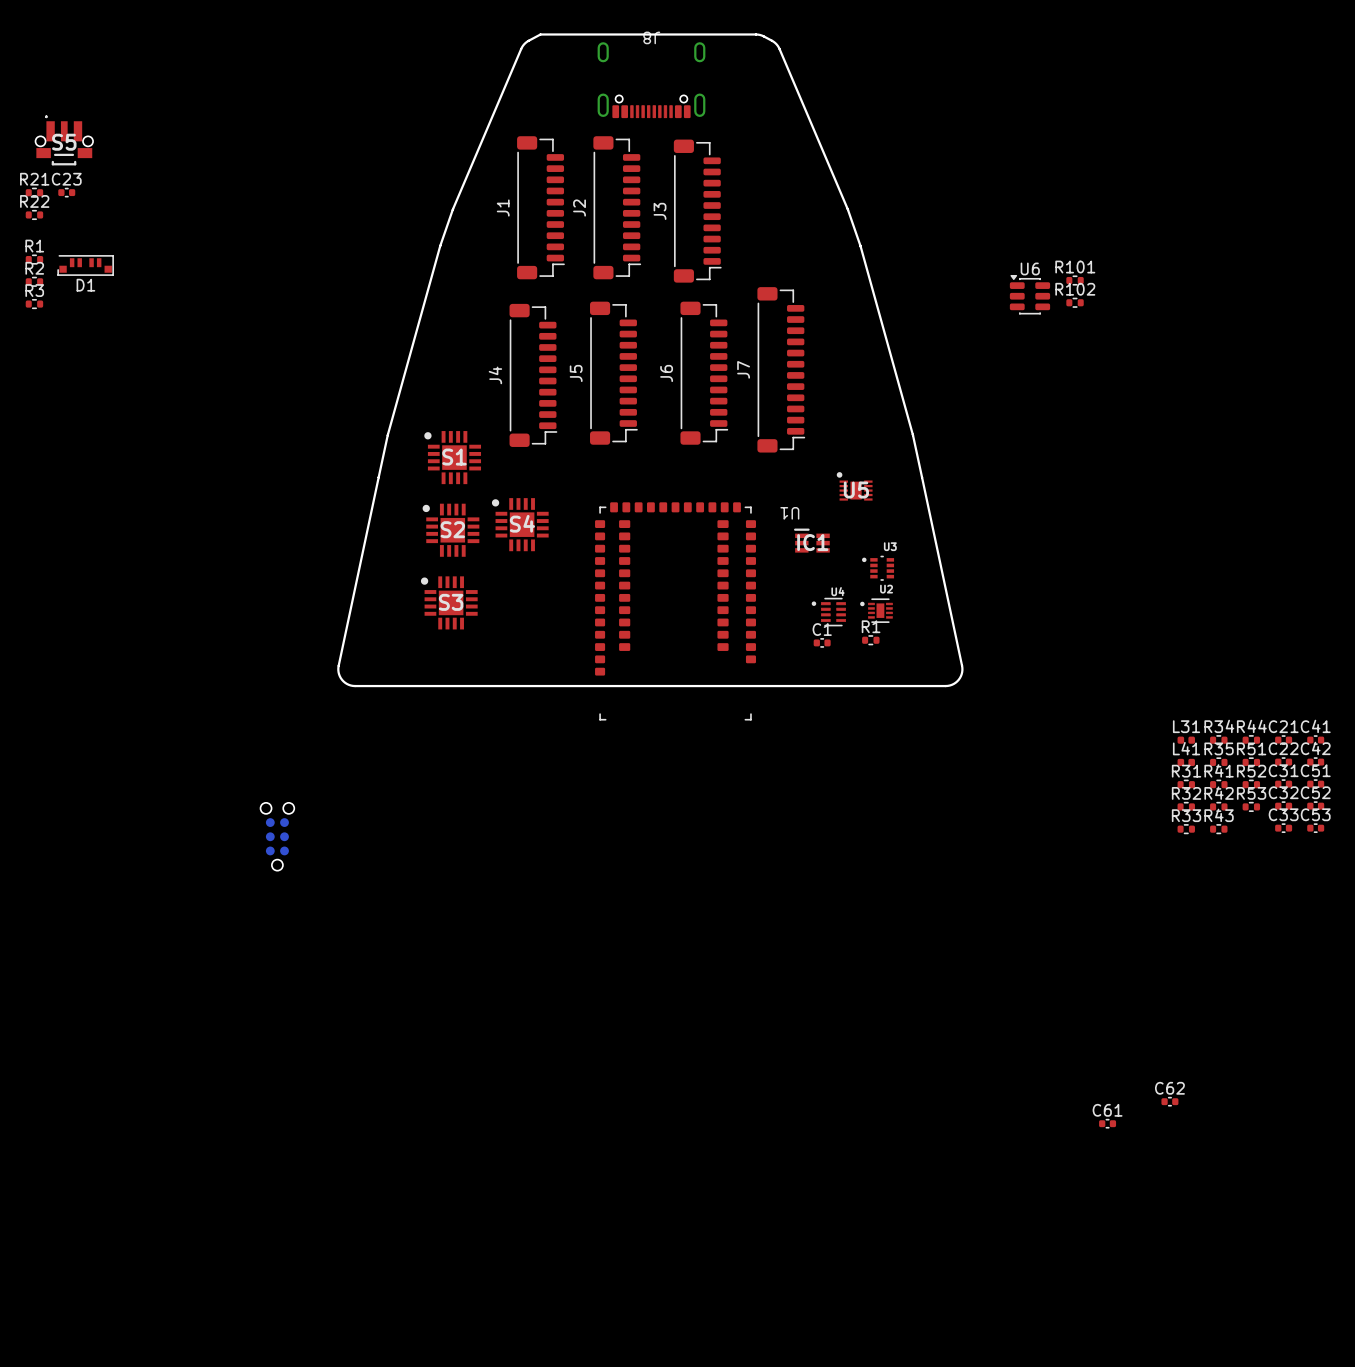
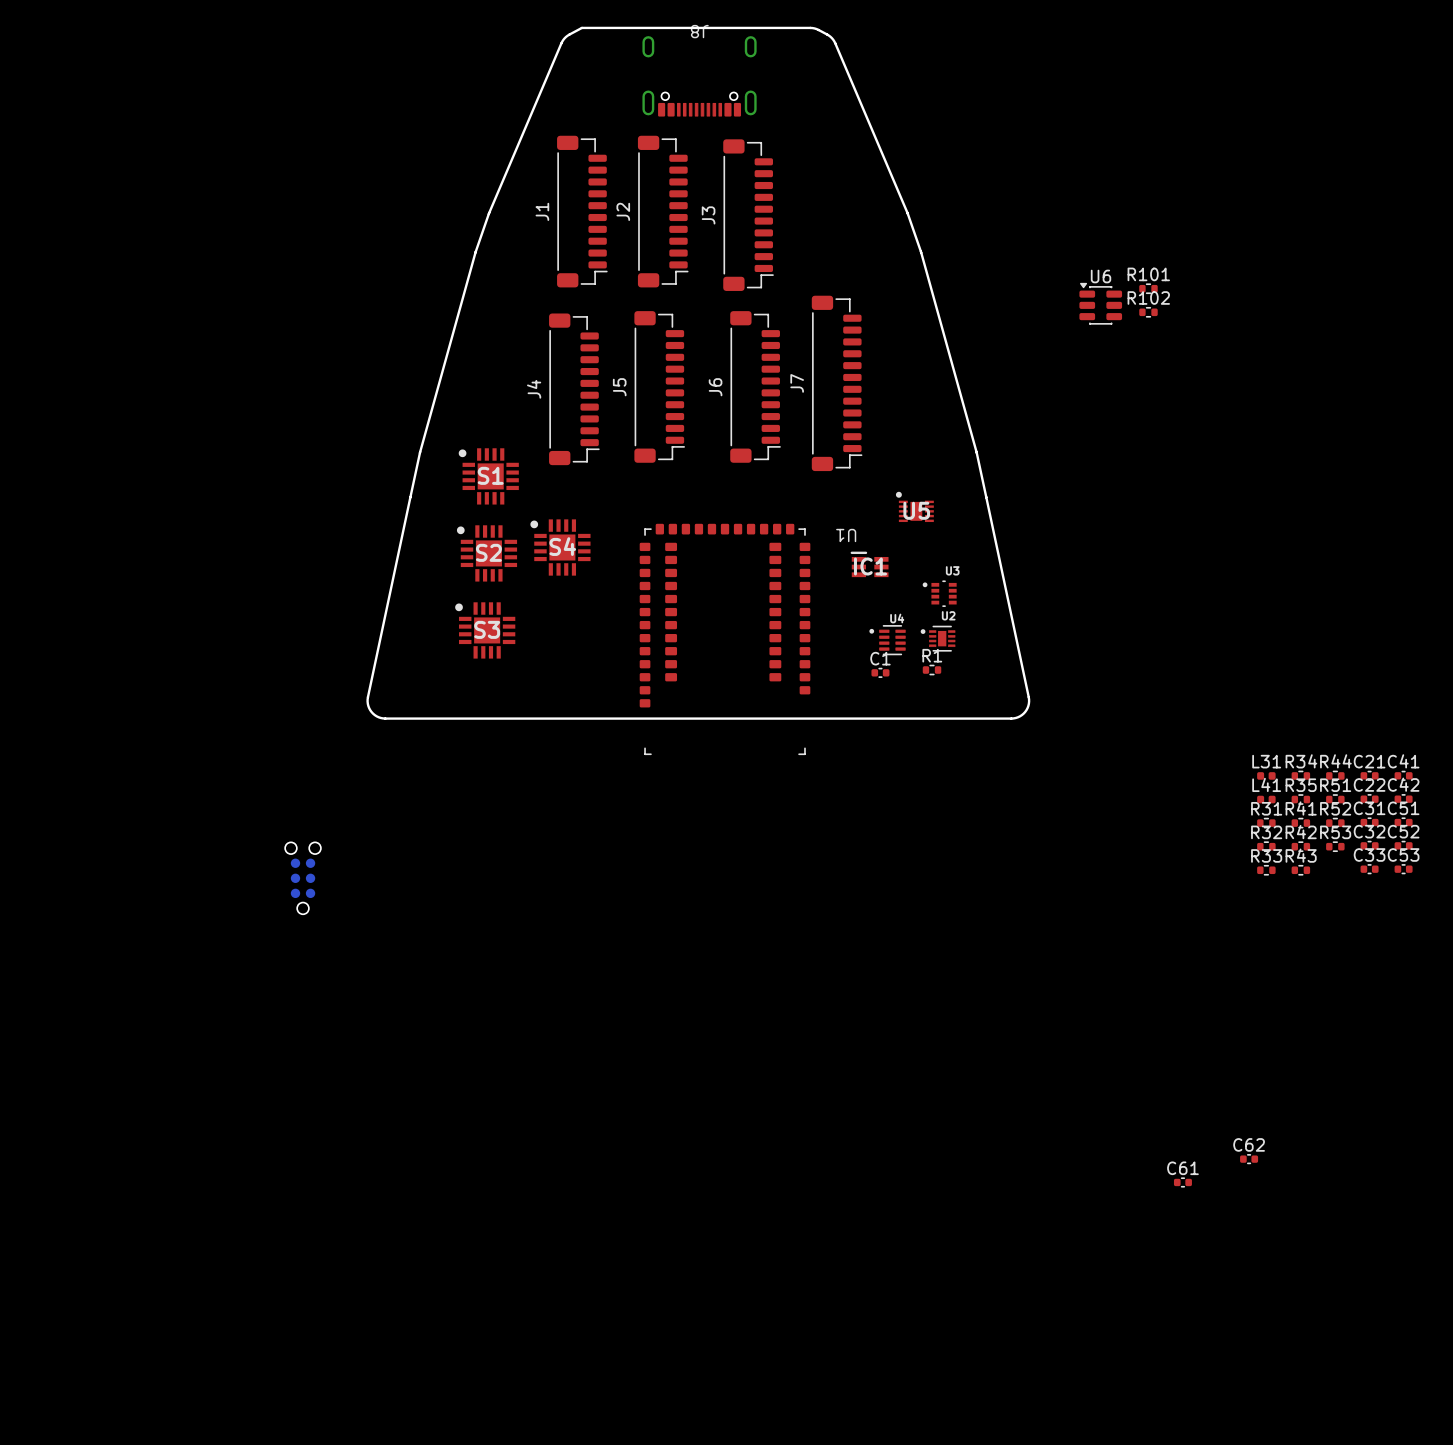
S5: (64, 140) -> none
R21: (34, 192) -> none
C23: (66, 192) -> none
R22: (34, 214) -> none
R1: (34, 259) -> none
D1: (85, 265) -> none
R2: (34, 281) -> none
R3: (34, 304) -> none

